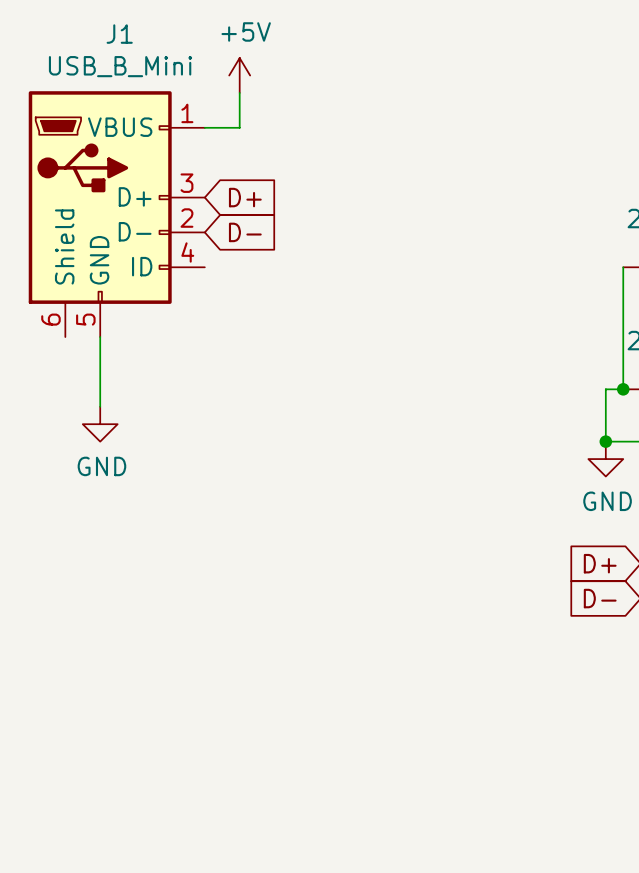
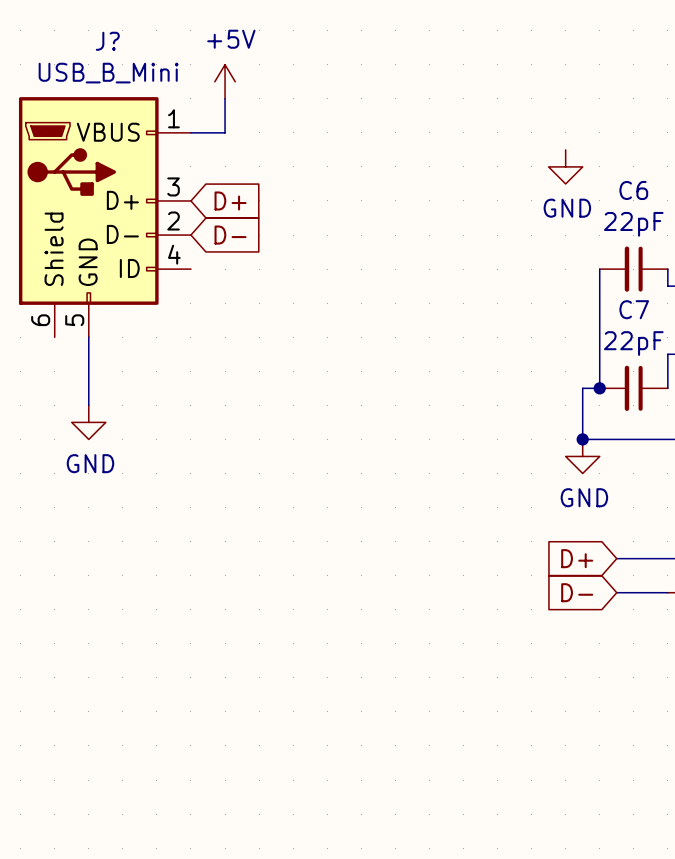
J1 name: J1 (119, 34) -> J? (107, 41)
power symbol: none -> GND (565, 166)

